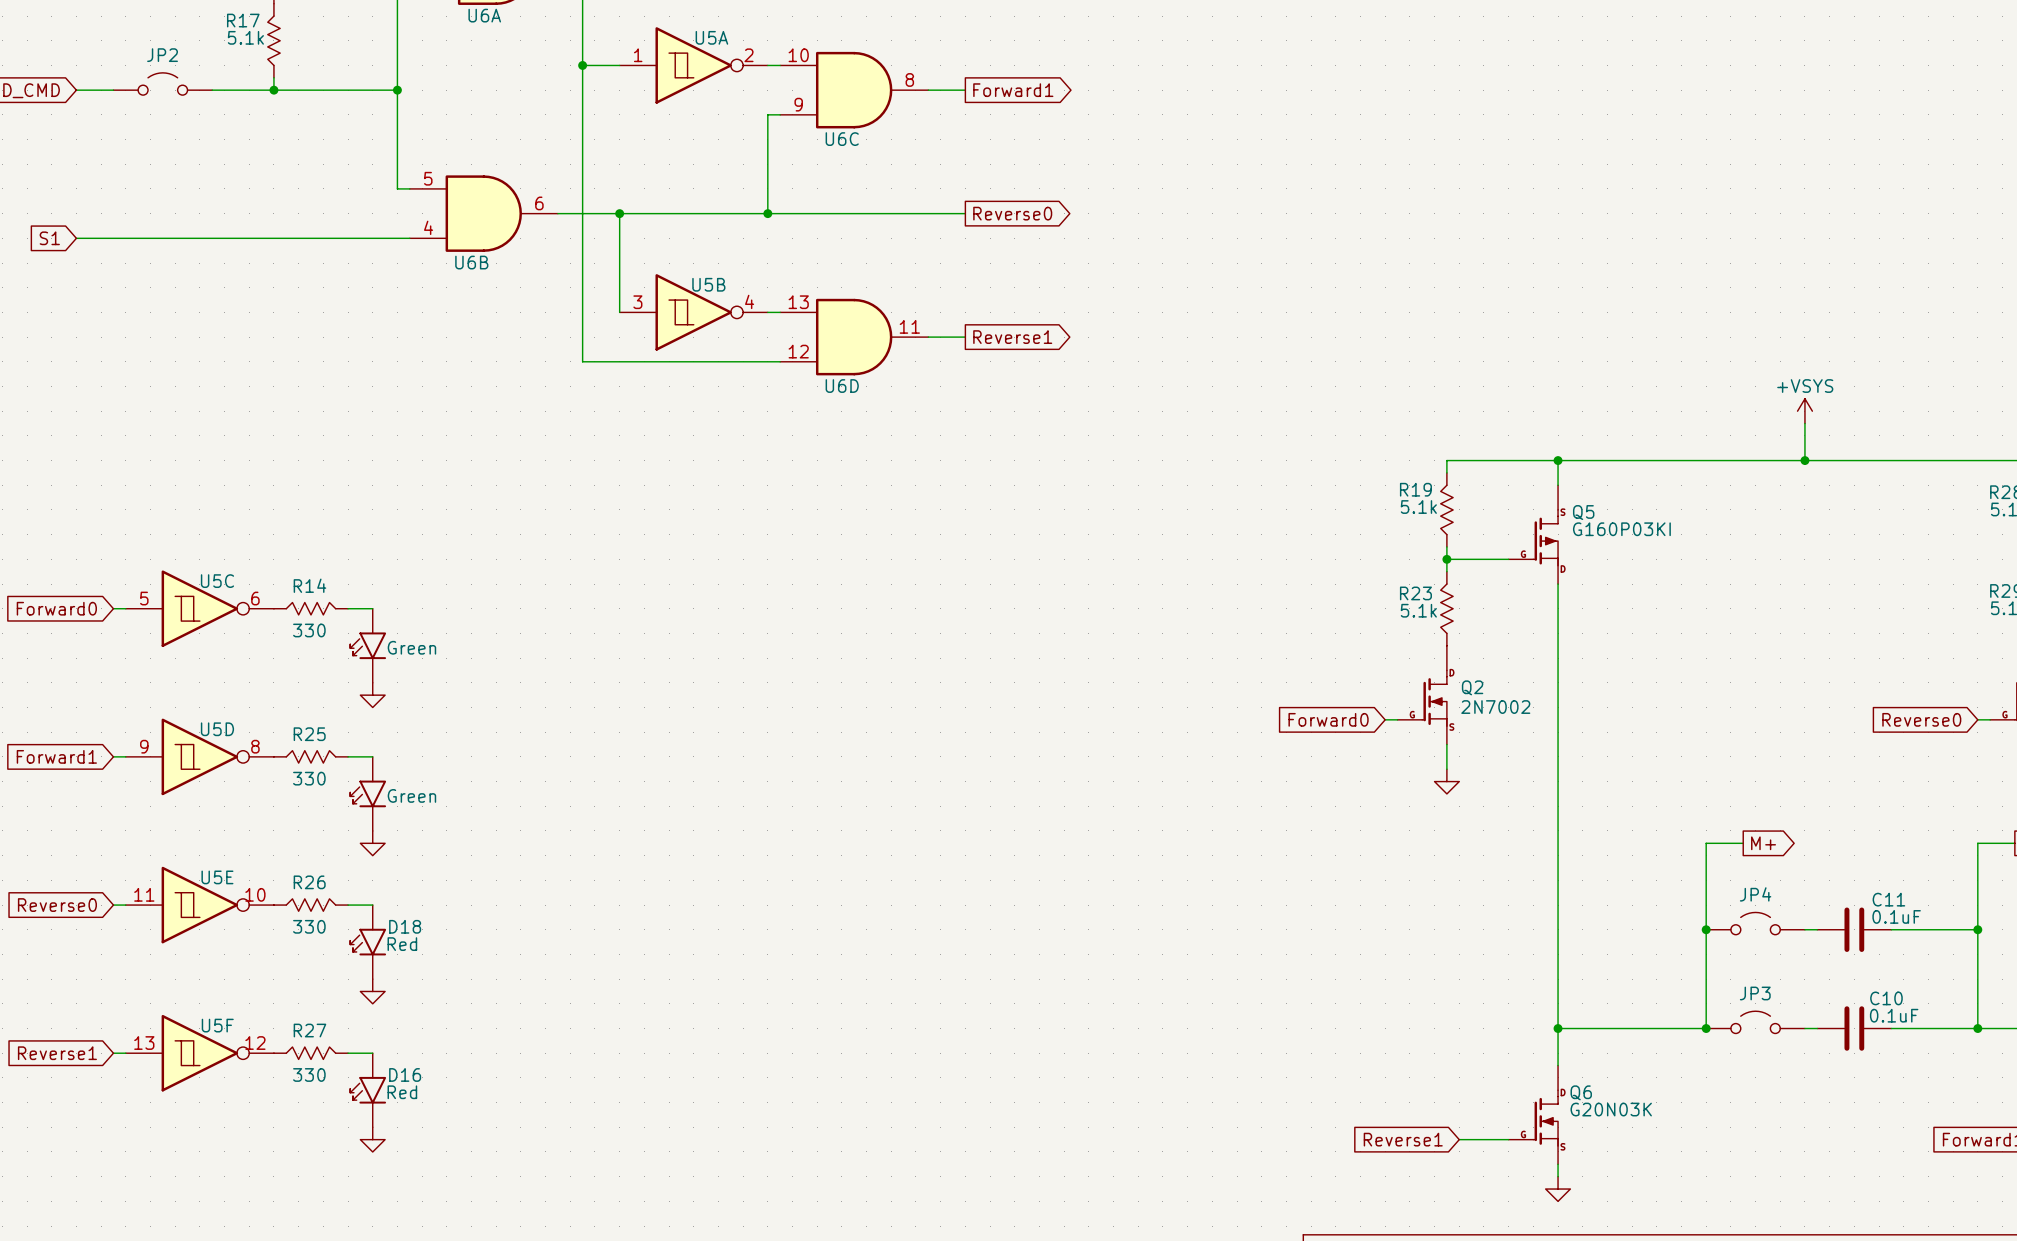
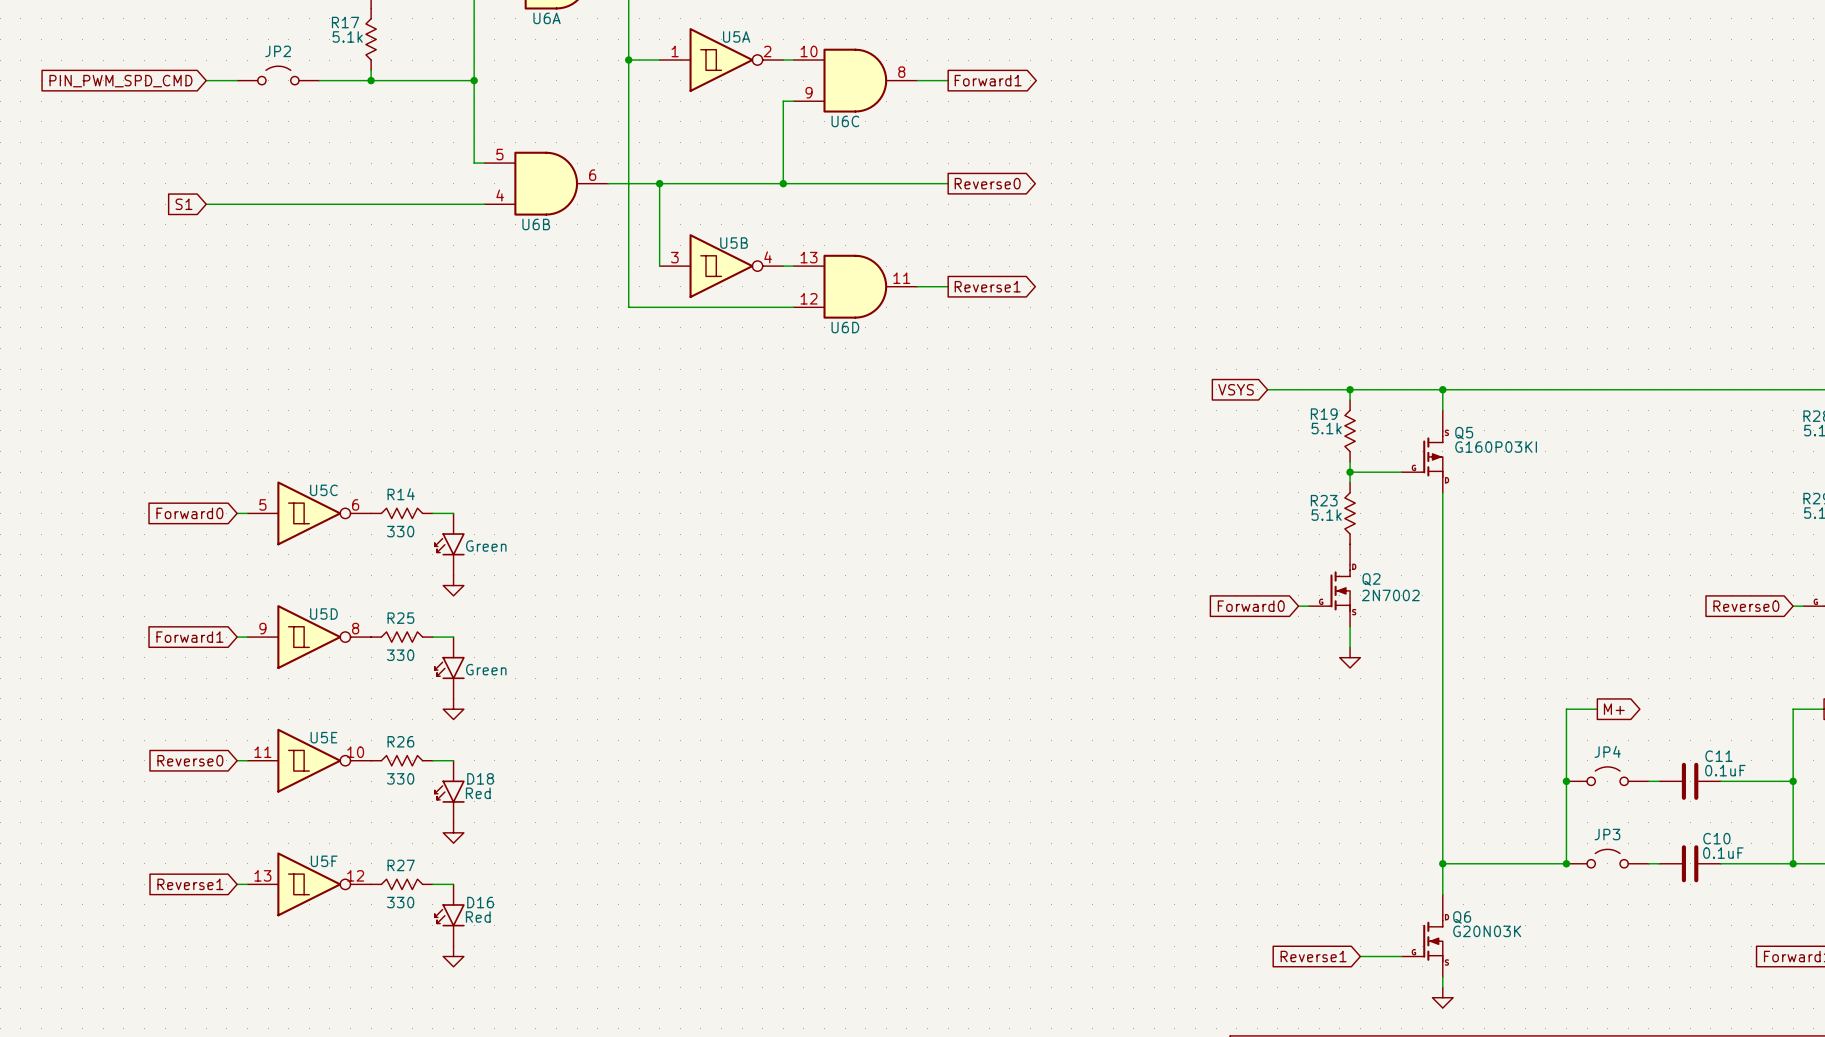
power symbol: +VSYS (1804, 411) -> none
wire: (1804, 423) (1804, 460) -> none
global label: none -> VSYS (1236, 389)
wire: none -> (1267, 389) (1350, 389)
junction: none -> (1350, 389)
junction: (1804, 460) -> none

